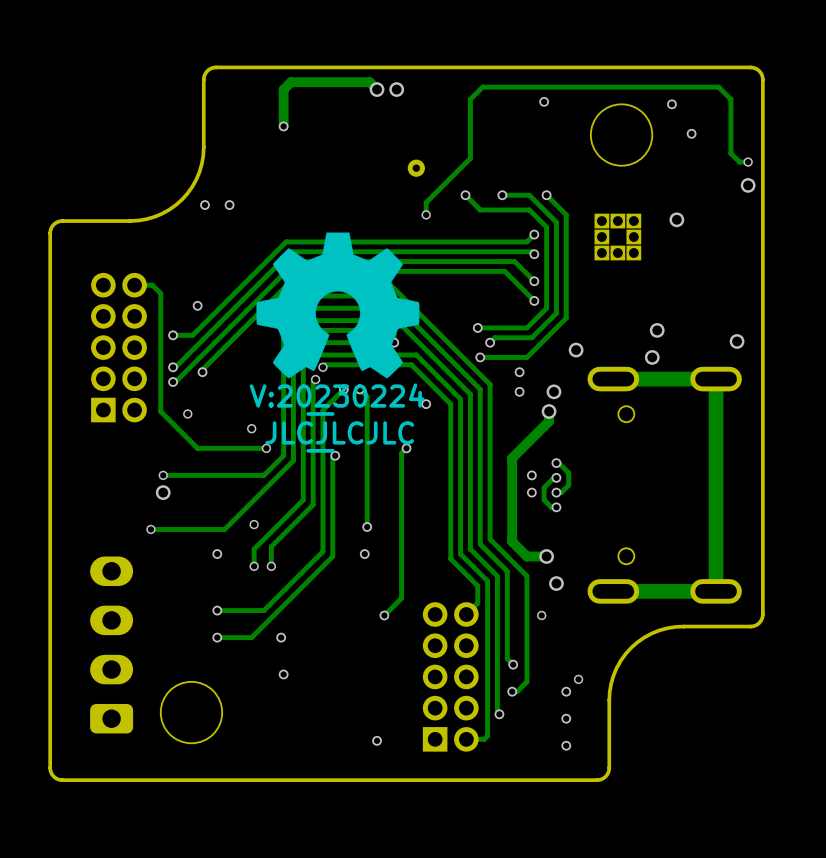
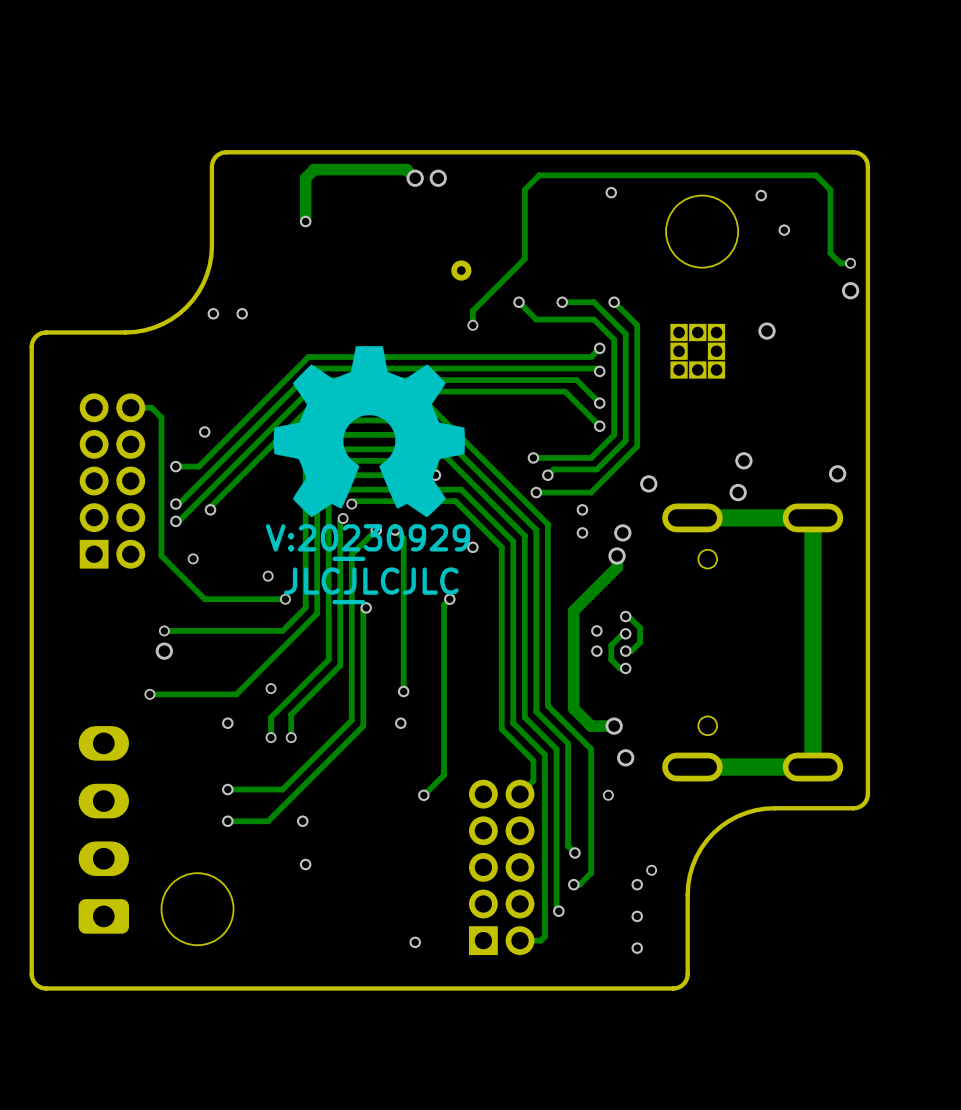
drawing shape: [249, 383, 425, 416] -> [265, 524, 471, 562]

